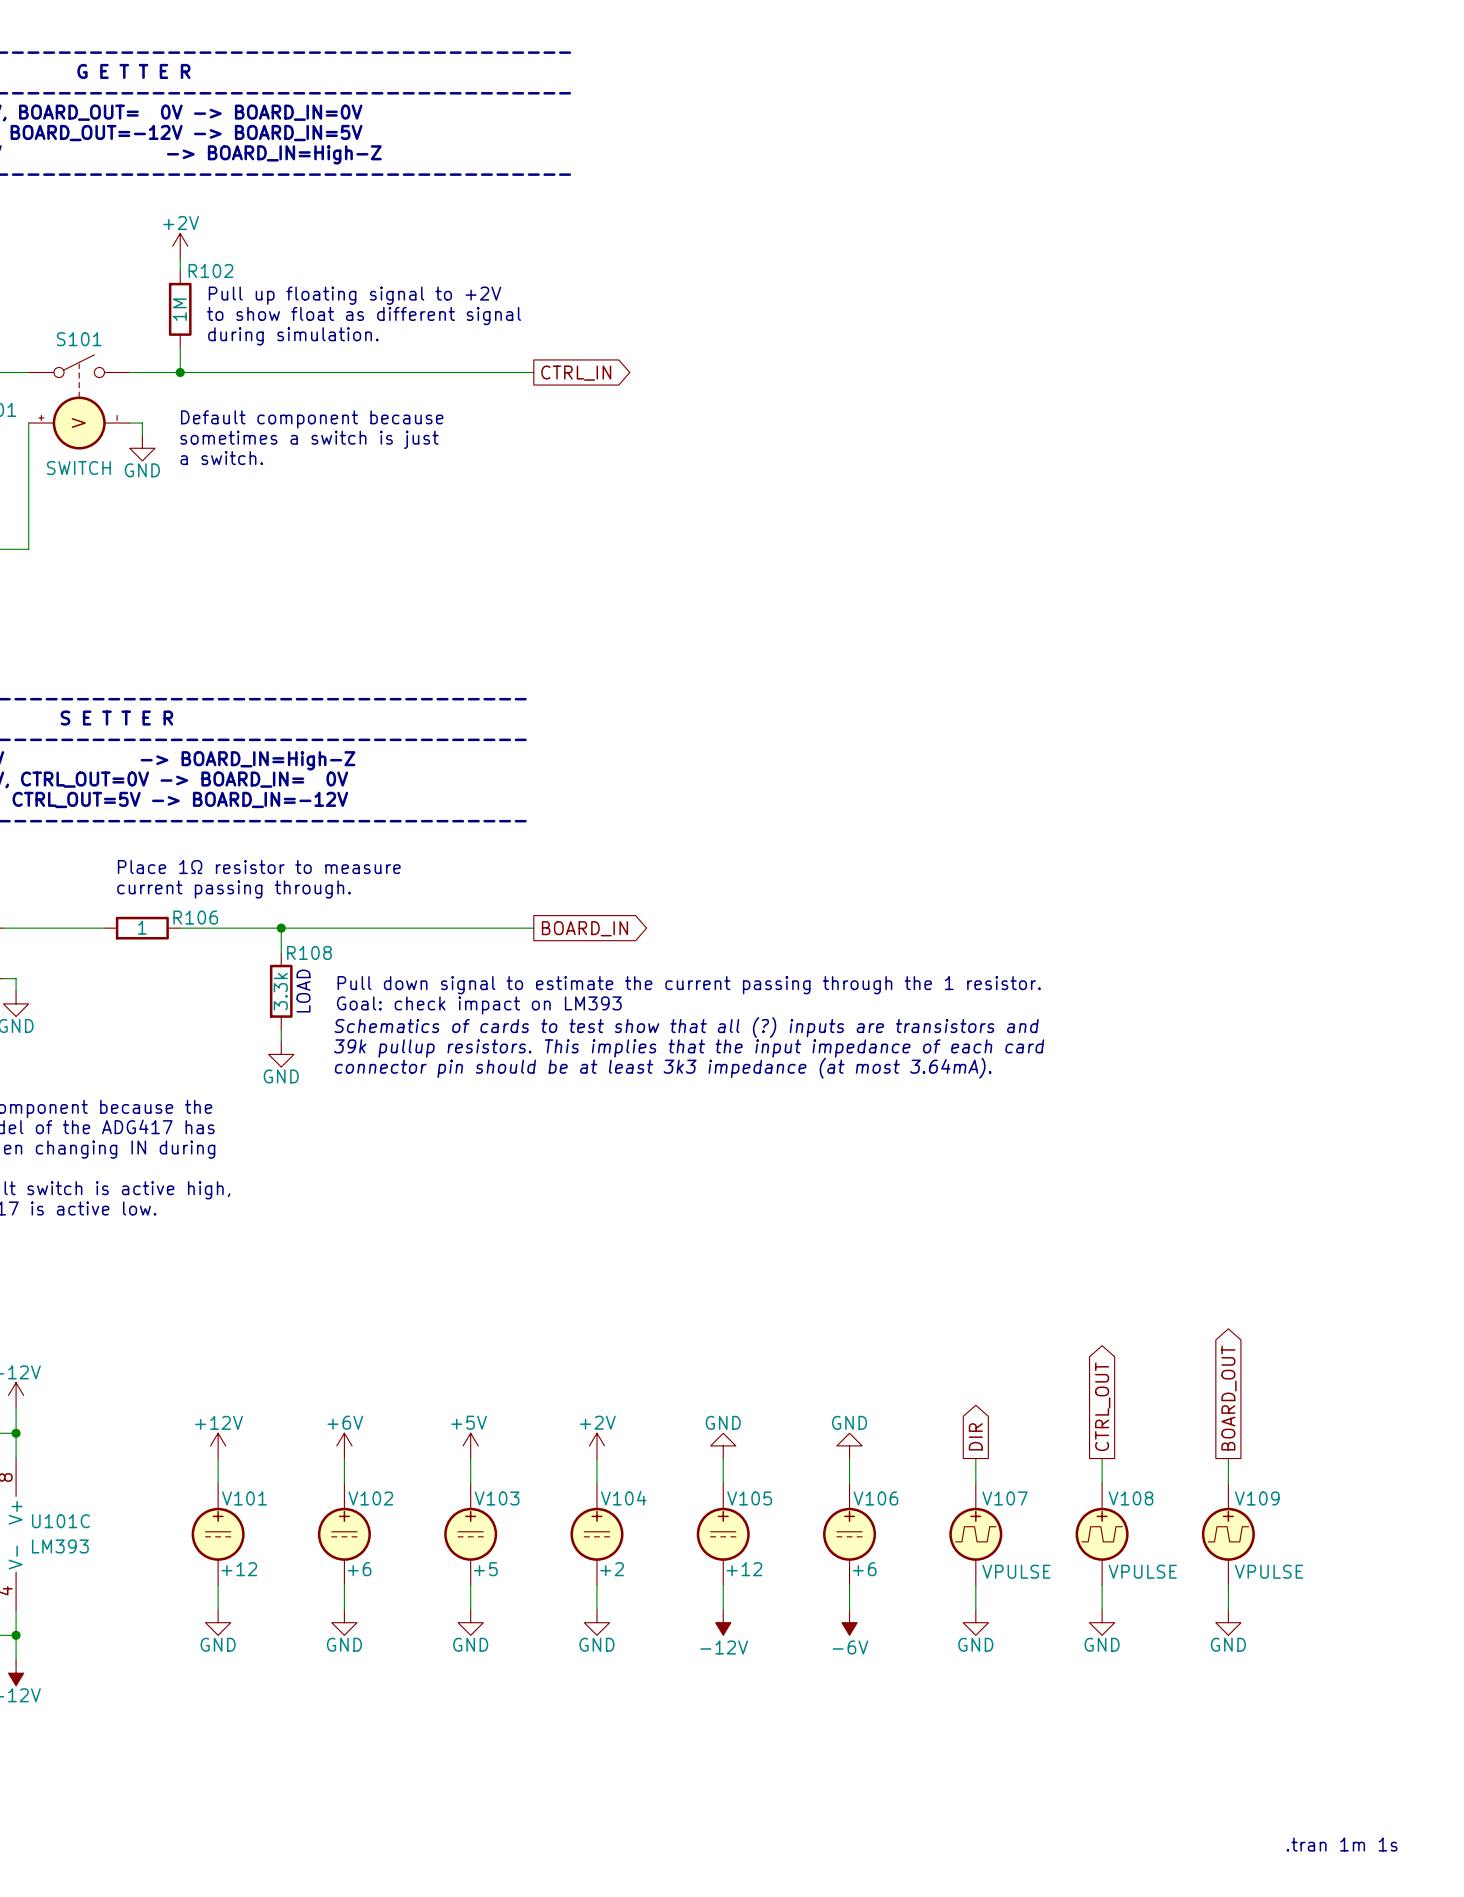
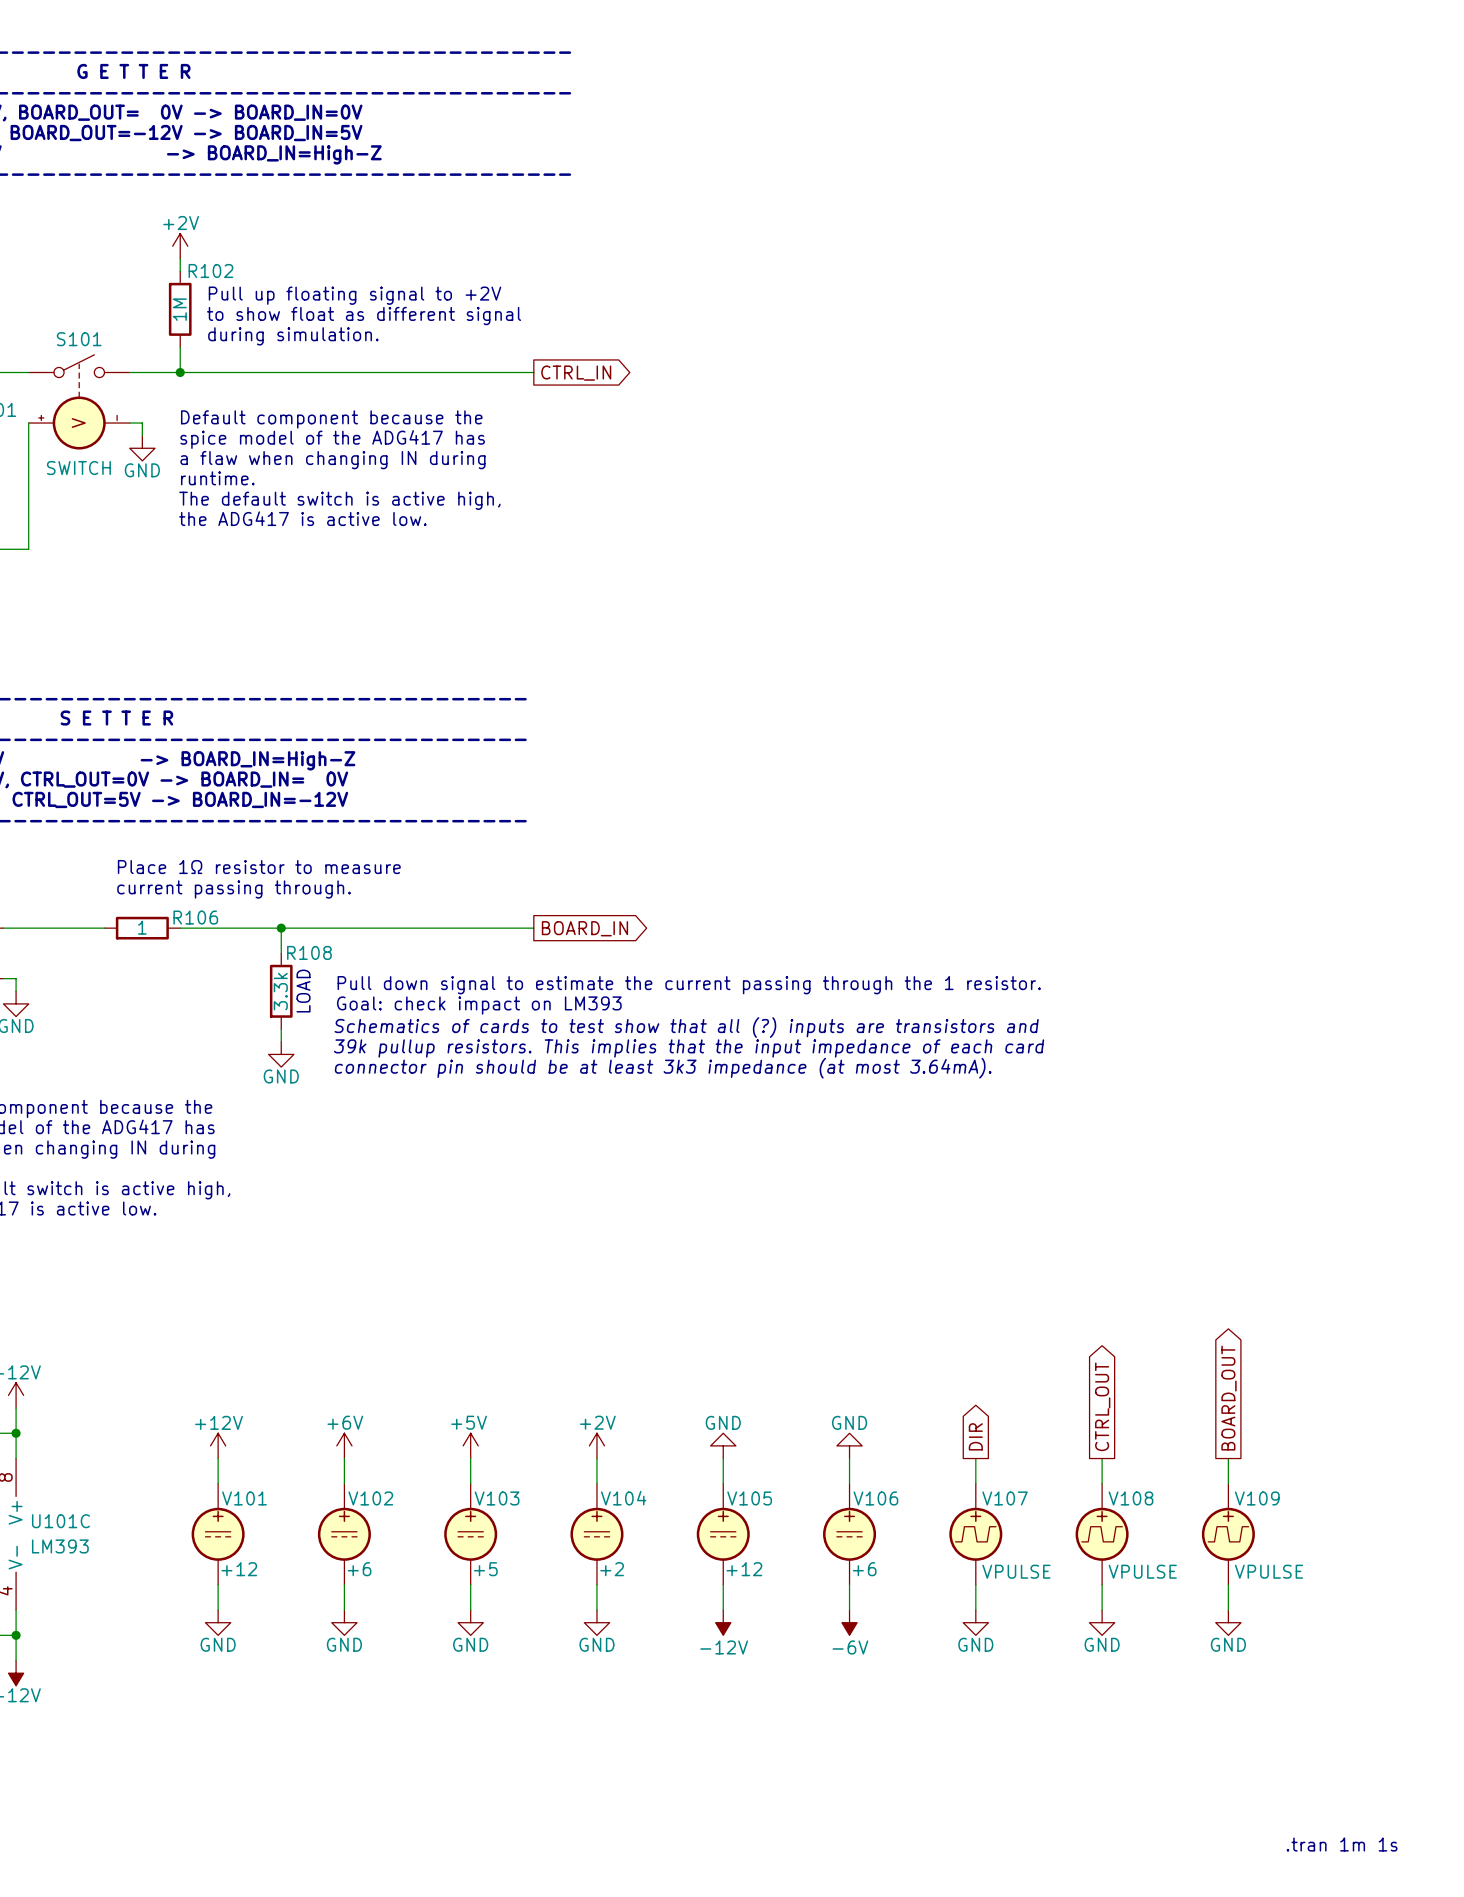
text: Default component because (312, 419) -> Default component because the (331, 419)
text: sometimes a switch is just (309, 439) -> spice model of the ADG417 has (332, 439)
text: a switch. (221, 458) -> a flaw when changing IN during (332, 460)
text: none -> runtime. (217, 478)
text: none -> The default switch is active high, (339, 500)
text: none -> the ADG417 is active low. (302, 518)

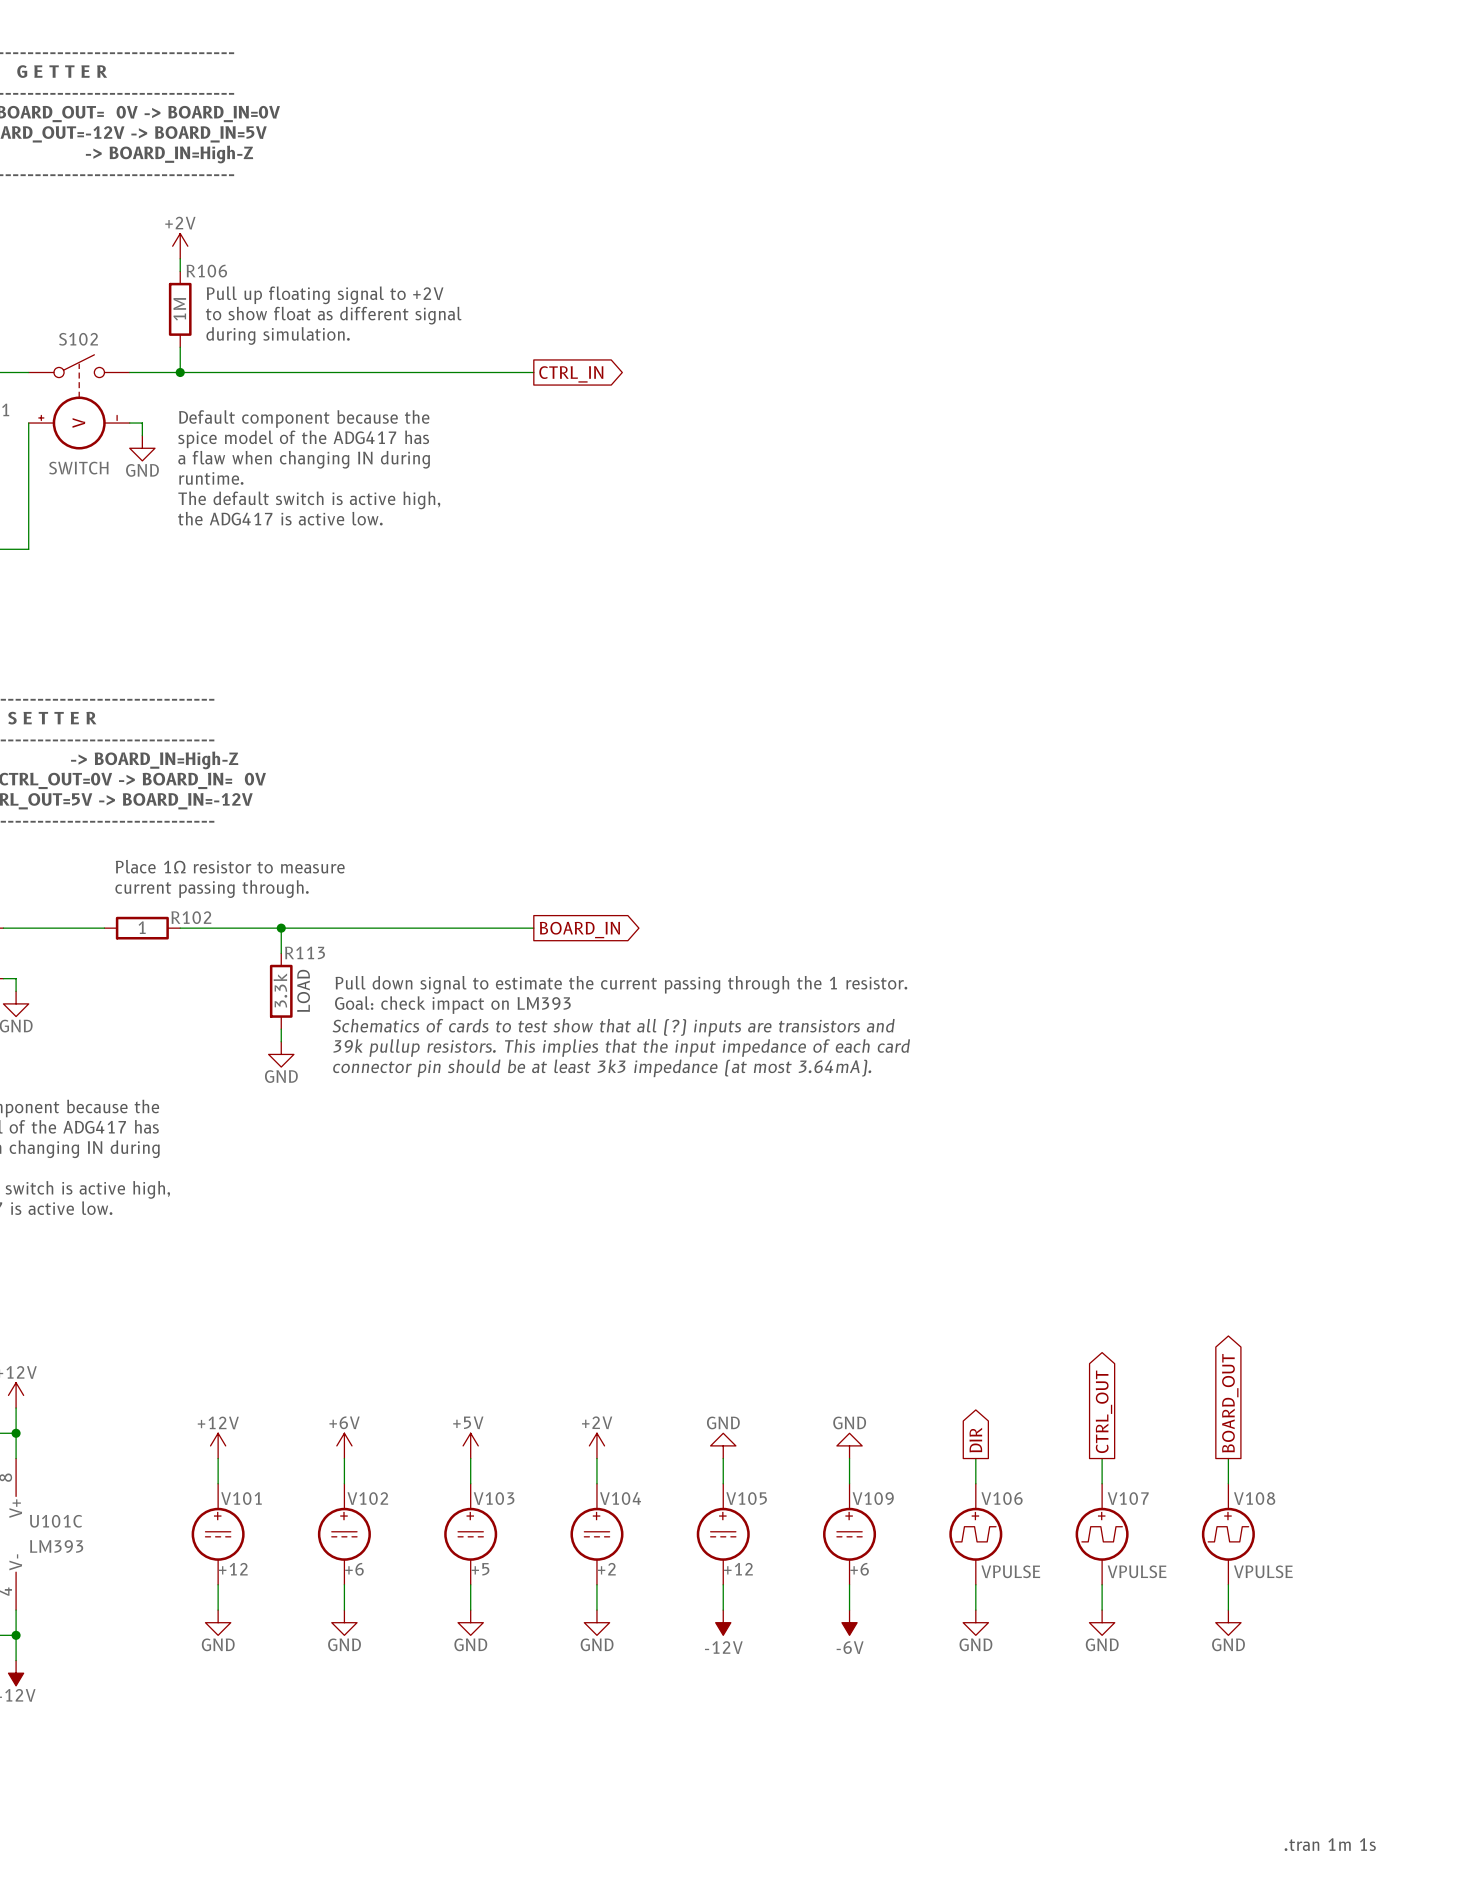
R102 name: R102 (210, 271) -> R106 (206, 271)
S101 name: S101 (79, 339) -> S102 (78, 339)
R106 name: R106 (195, 917) -> R102 (191, 917)
R108 name: R108 (309, 952) -> R113 (305, 952)
V106 name: V106 (875, 1498) -> V109 (873, 1498)
V107 name: V107 (1005, 1498) -> V106 (1002, 1498)
V108 name: V108 (1131, 1498) -> V107 (1128, 1498)
V109 name: V109 (1257, 1498) -> V108 (1254, 1498)

